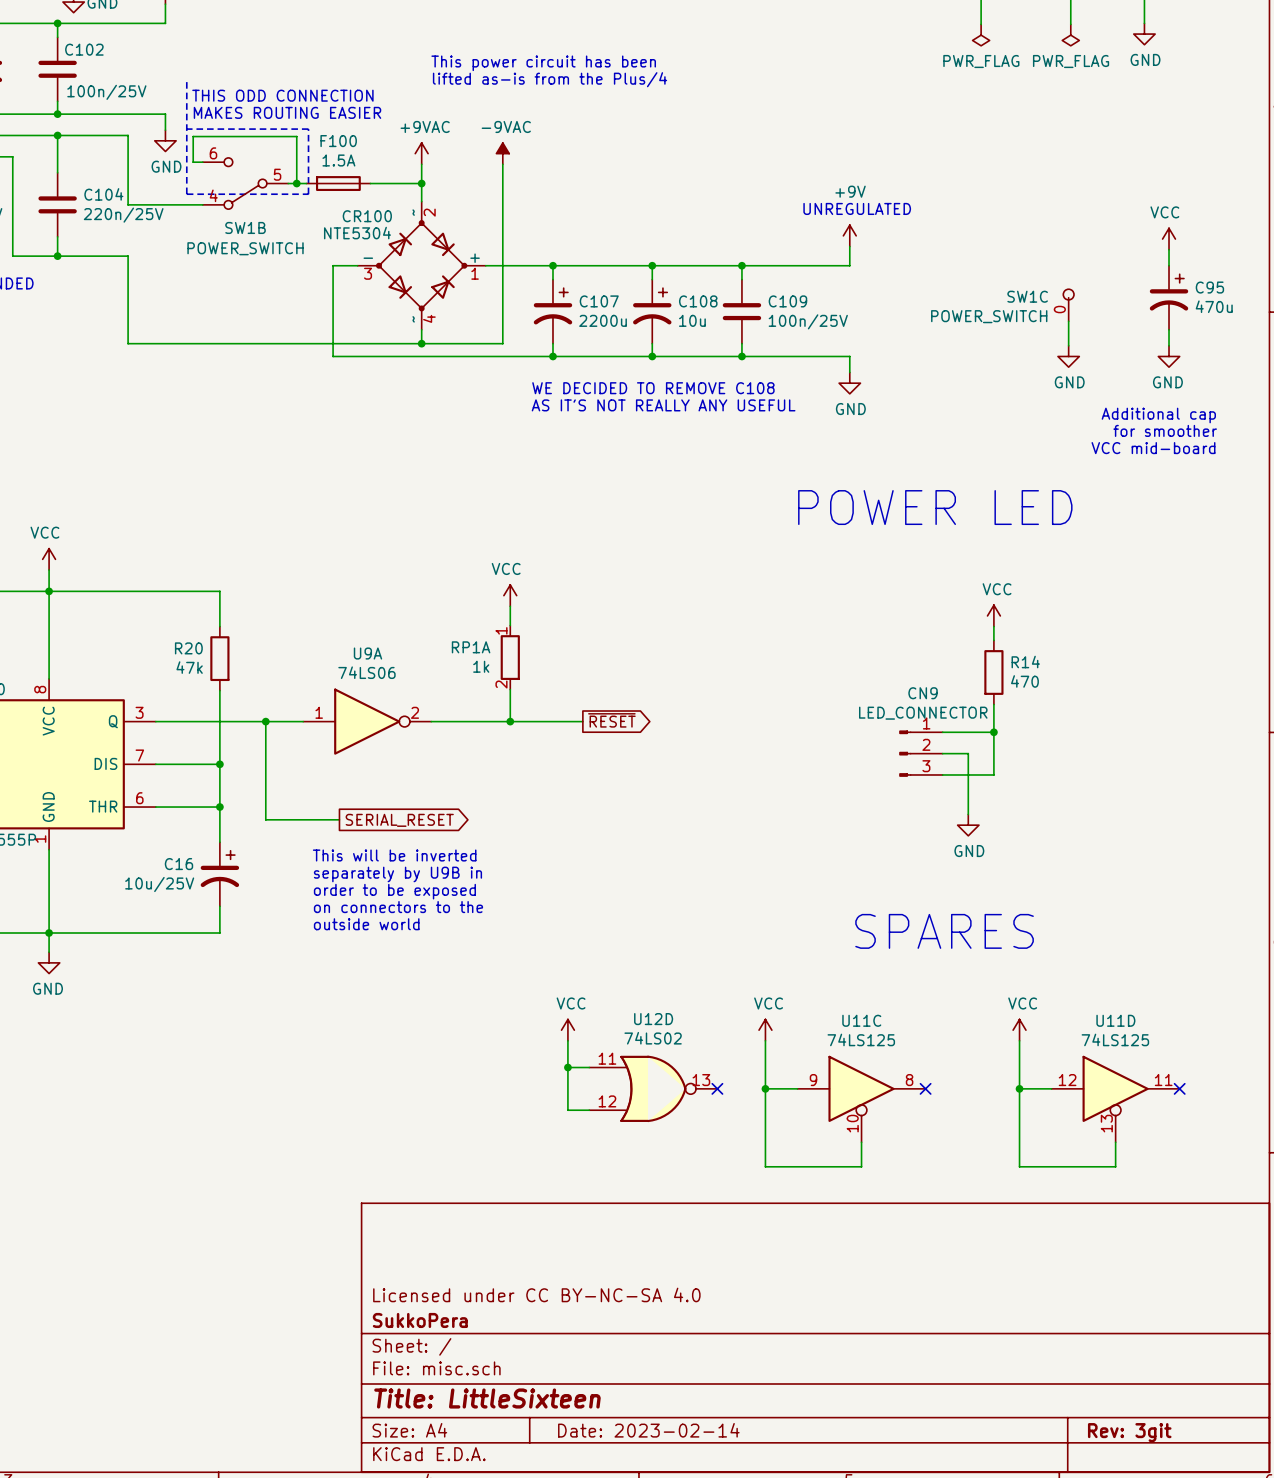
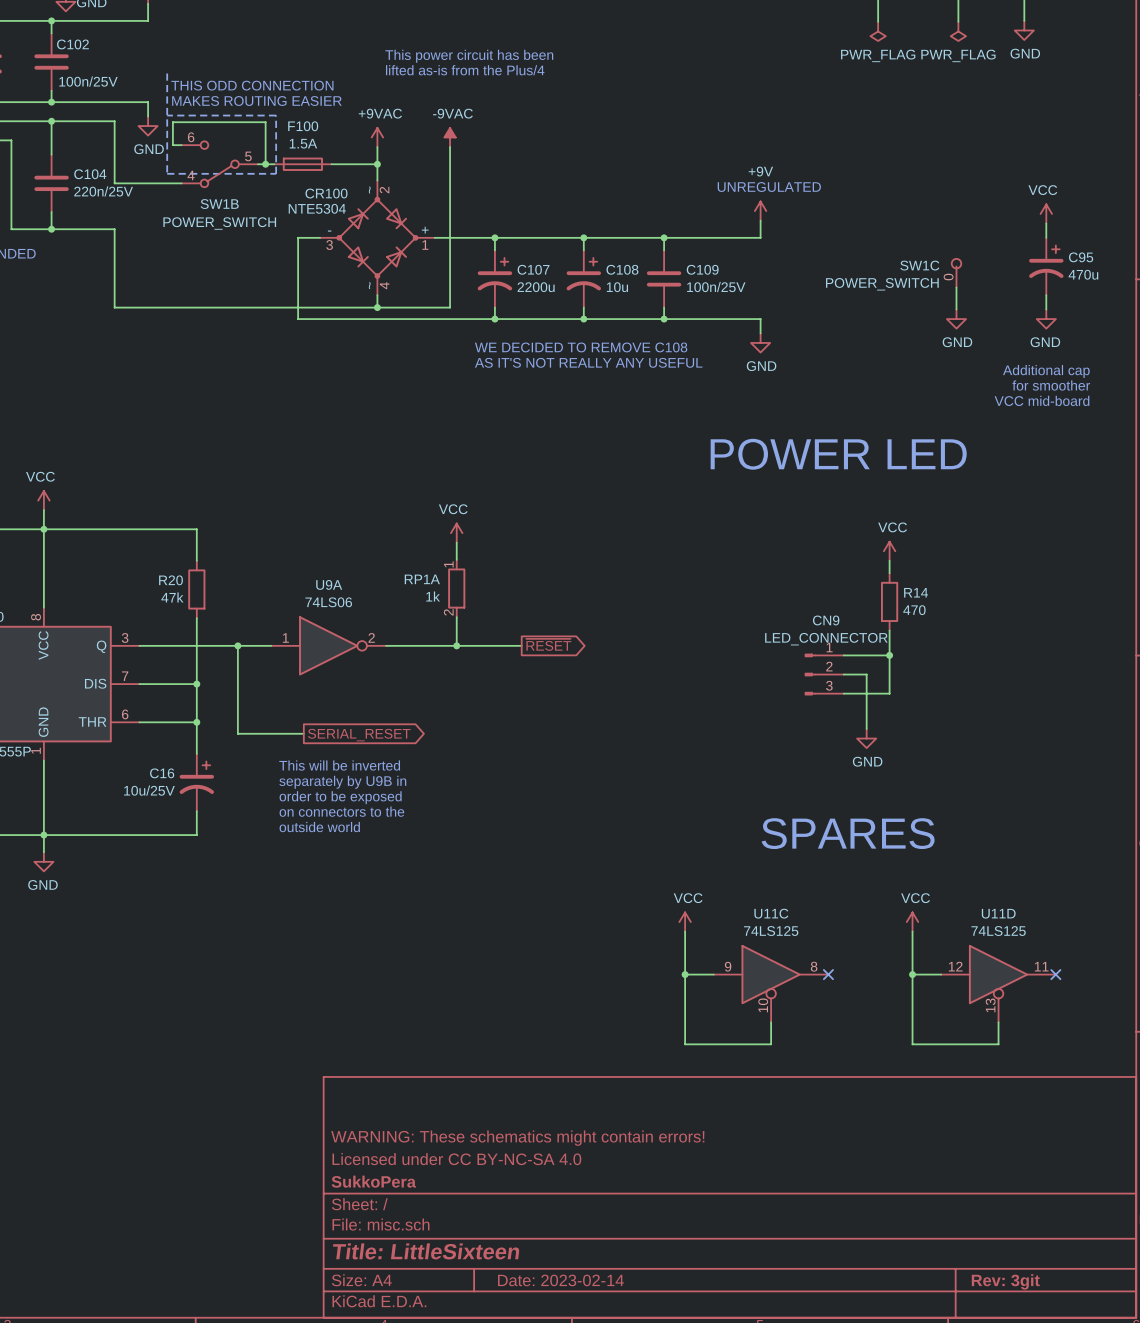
power symbol: VCC (567, 1030) -> none
wire: (567, 1040) (567, 1110) (589, 1110) -> none
wire: (567, 1067) (589, 1067) -> none
junction: (567, 1067) -> none
U12D: 74LS02 (653, 1088) -> none
no-connect mark: (717, 1088) -> none
title block: none -> WARNING: These schematics might contain errors! (517, 1138)

